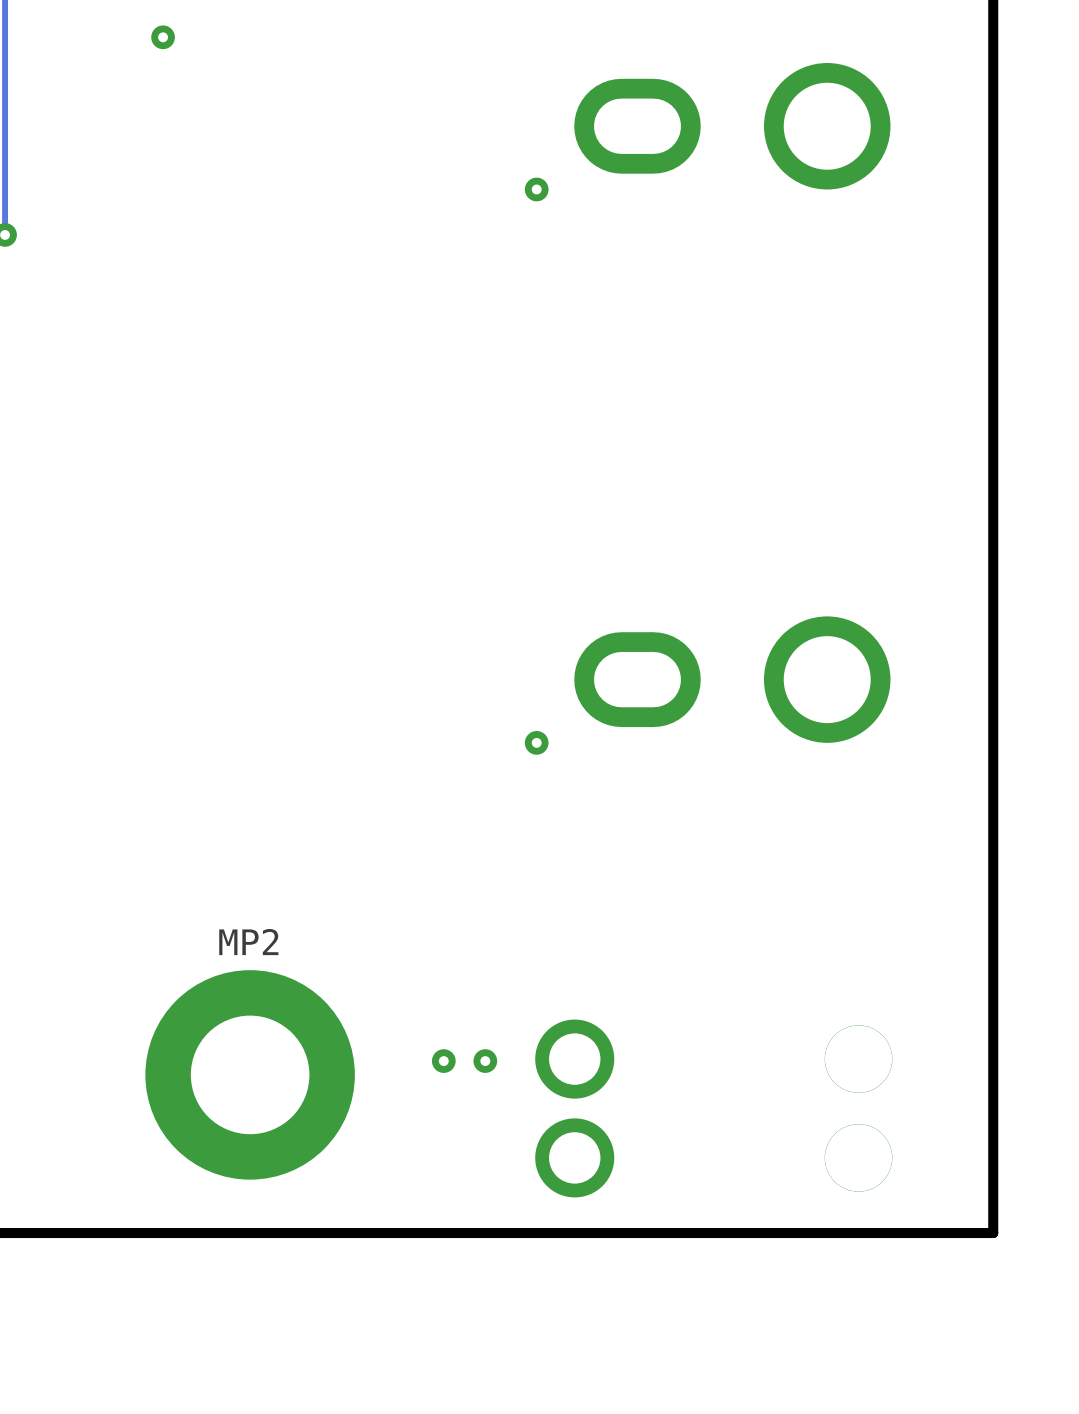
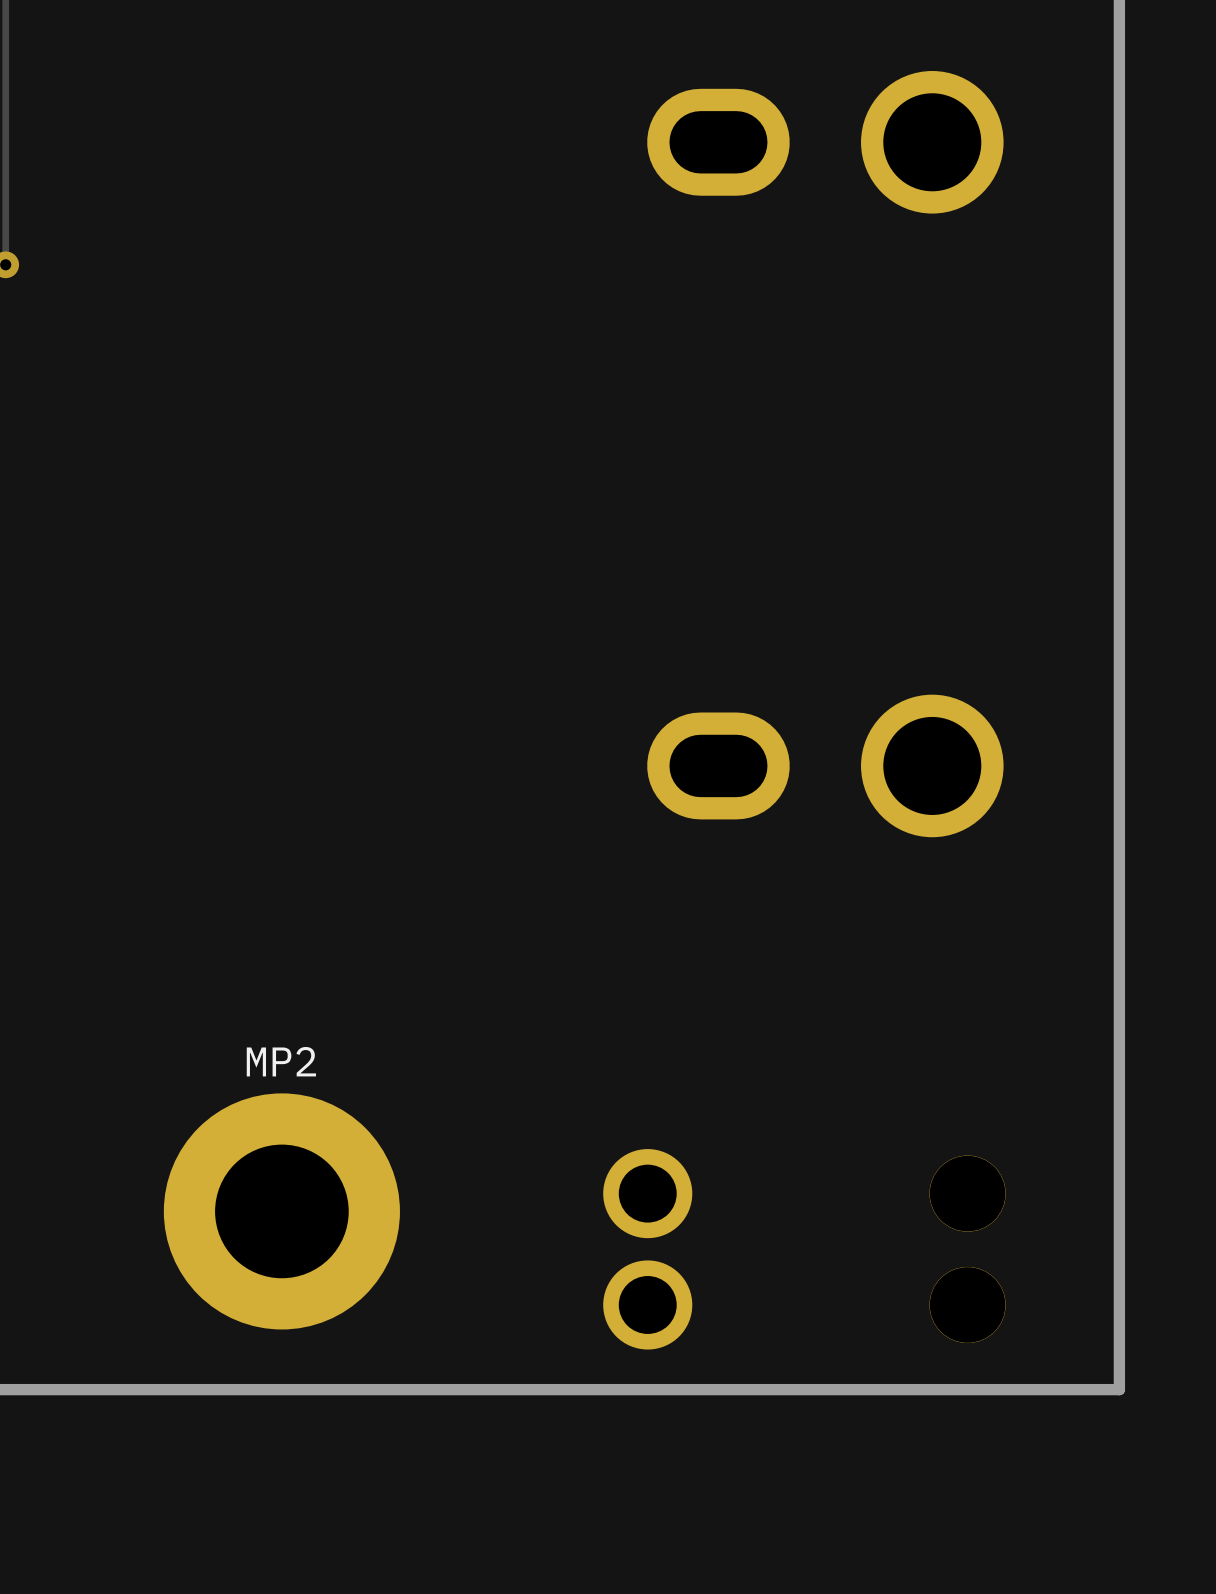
via: (163, 37) -> none
via: (536, 189) -> none
via: (536, 742) -> none
via: (443, 1061) -> none
via: (485, 1061) -> none

